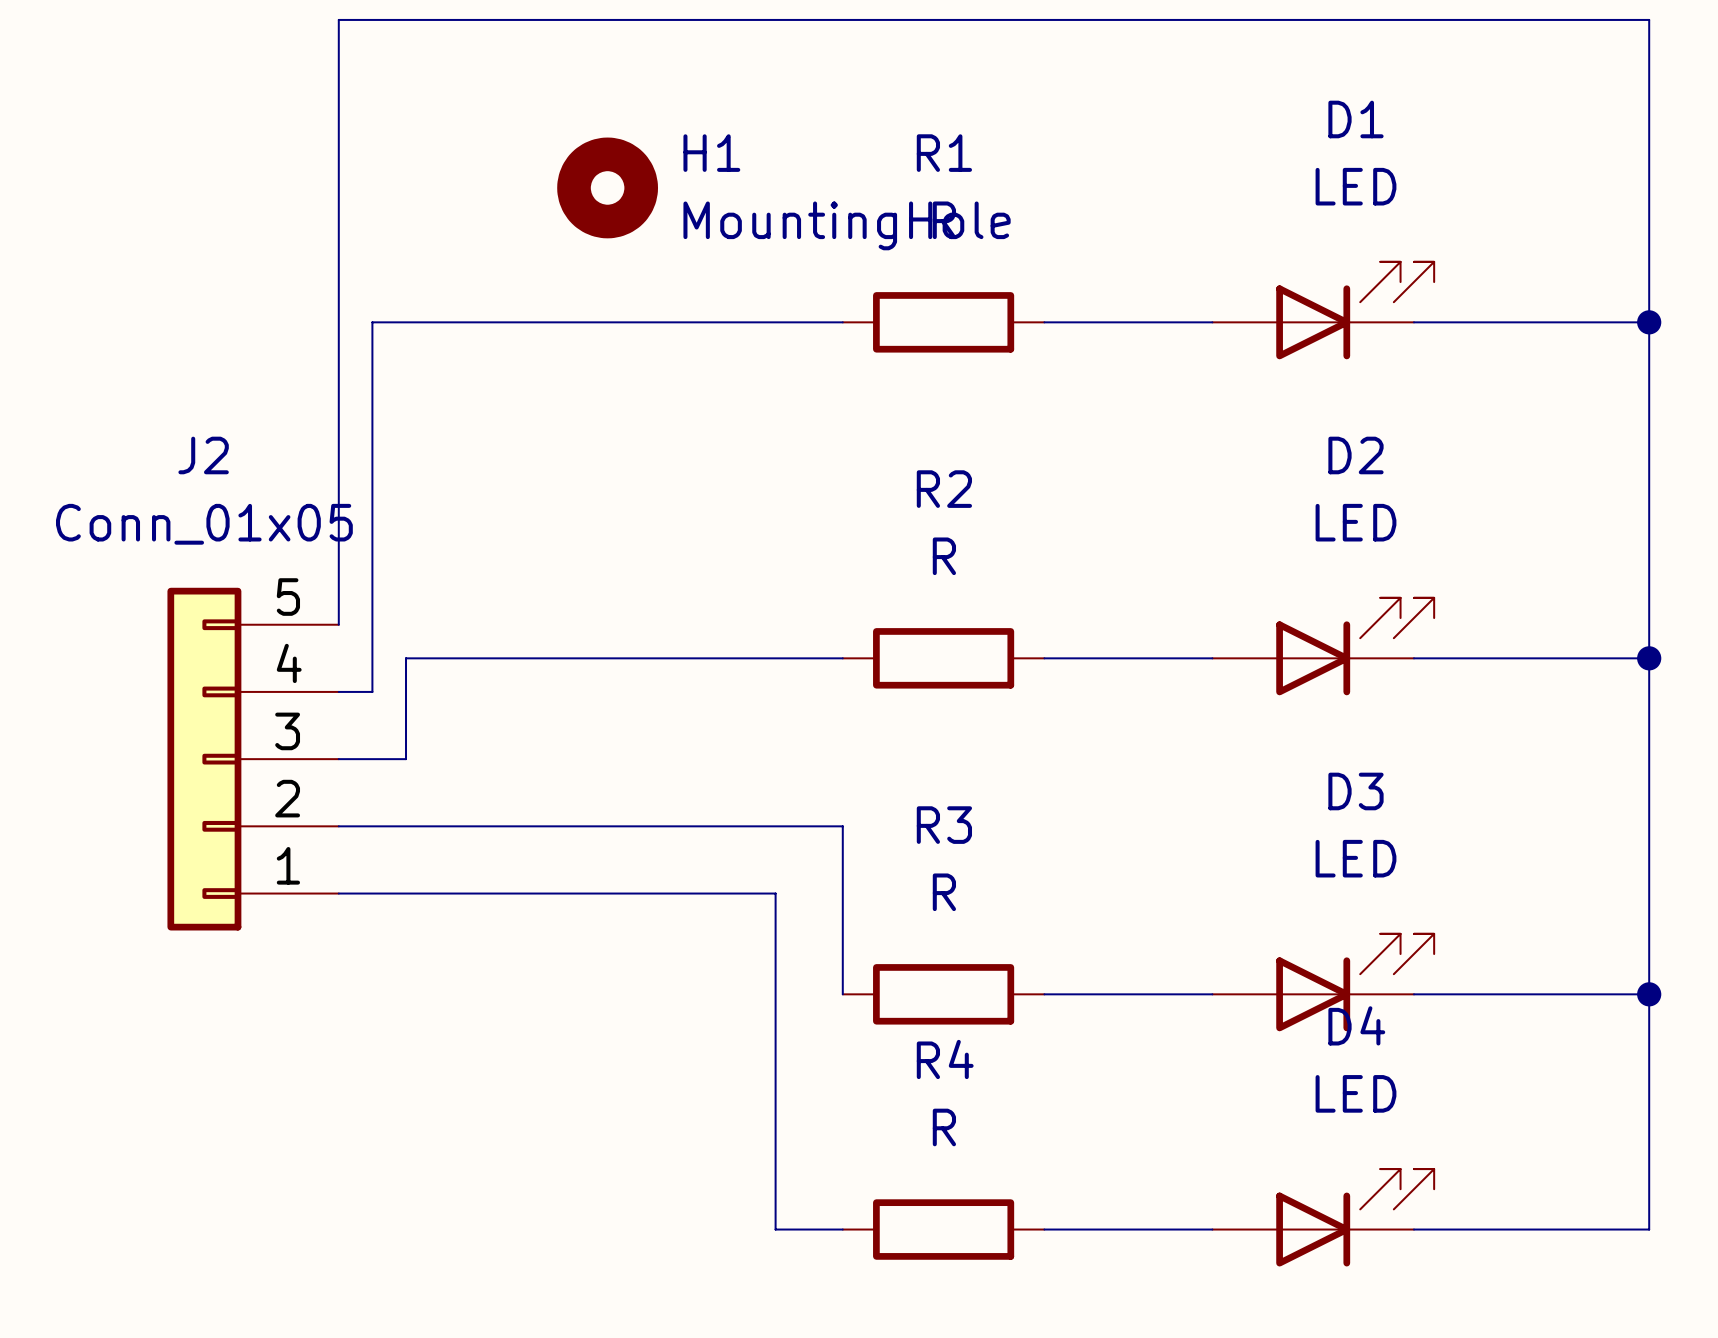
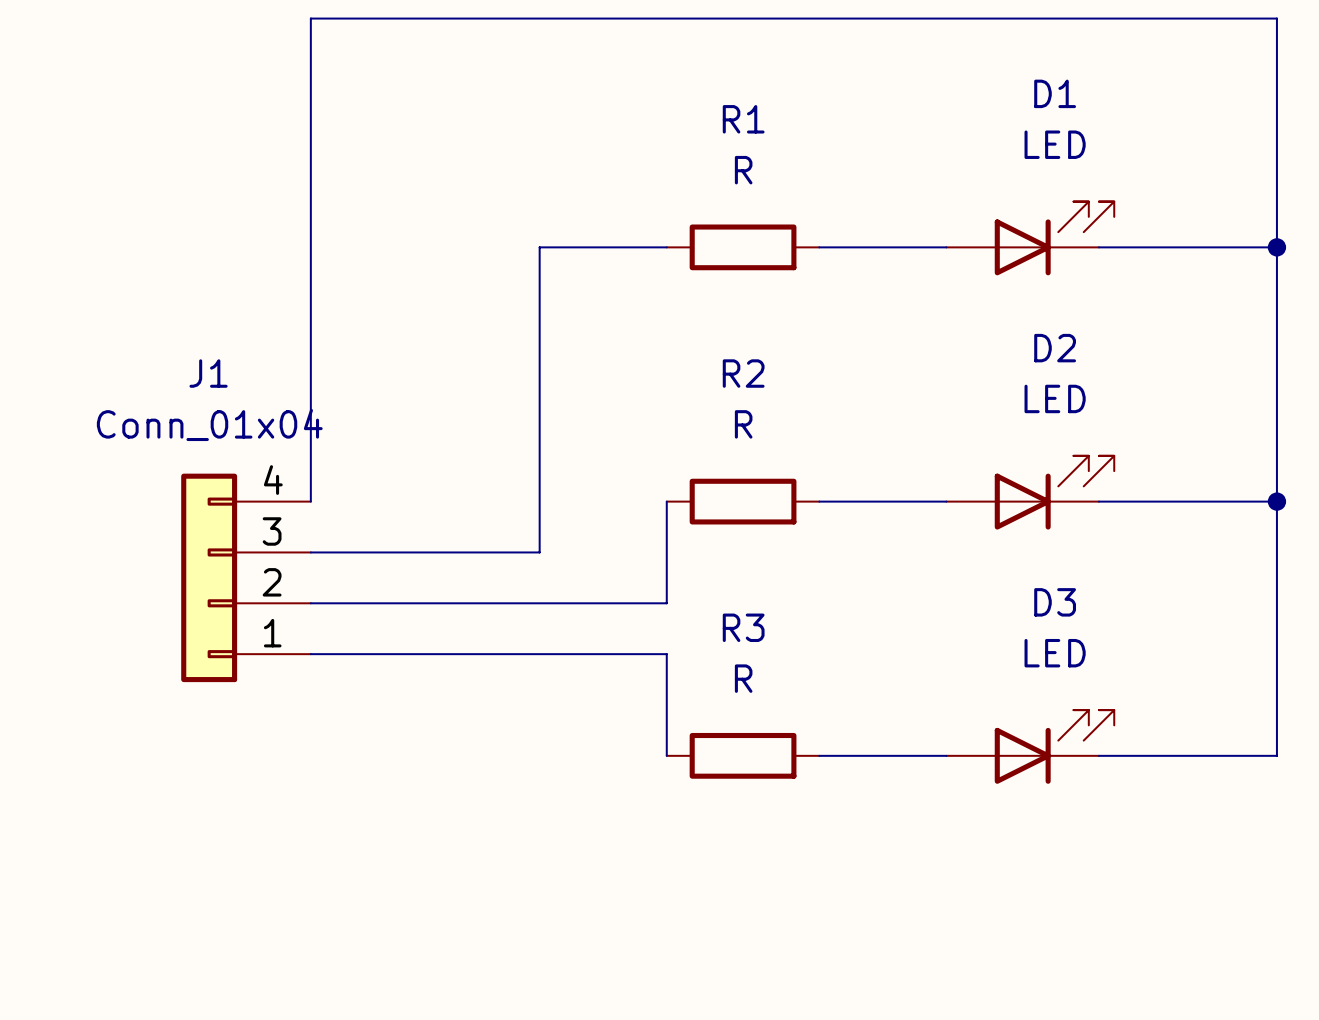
wire: (372, 19) (338, 19) (338, 624) -> (310, 18) (310, 247)
H1: MountingHole (607, 187) -> none
wire: (372, 322) (674, 322) -> (310, 552) (539, 552) (539, 247)
wire: (372, 658) (372, 691) (338, 691) -> none
wire: (842, 658) (406, 658) (406, 759) (338, 759) -> (666, 501) (666, 603) (310, 603)
J2: Conn_01x05 (253, 759) -> none
J1: none -> Conn_01x04 (246, 577)
wire: (338, 826) (842, 826) (842, 859) -> (310, 654) (666, 654)
wire: (338, 893) (775, 893) (775, 1229) (842, 1229) -> none
wire: (1649, 994) (1649, 1229) (1413, 1229) -> none
junction: (1649, 994) -> none
D4: LED (1323, 1217) -> none
R4: R (943, 1229) -> none
wire: (1044, 1229) (1212, 1229) -> none

